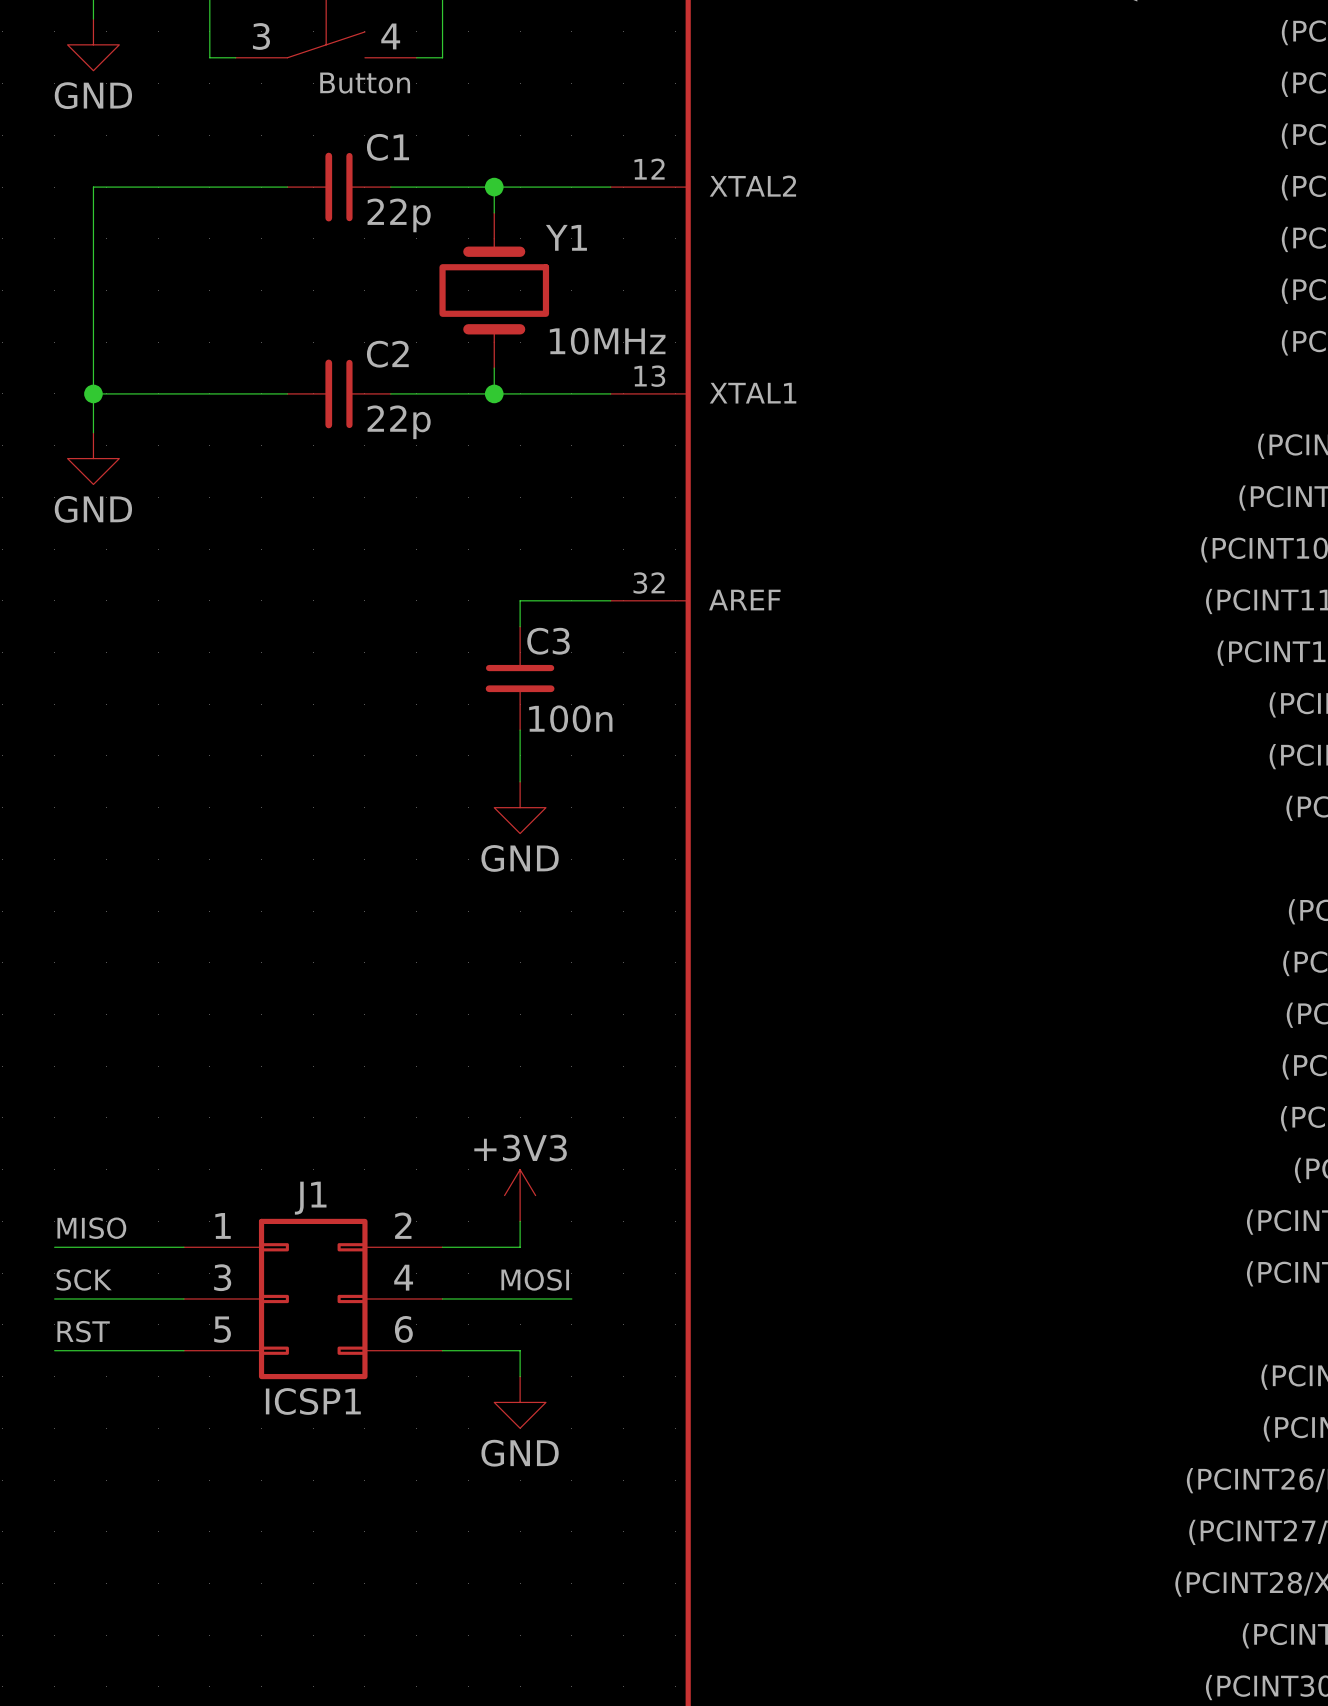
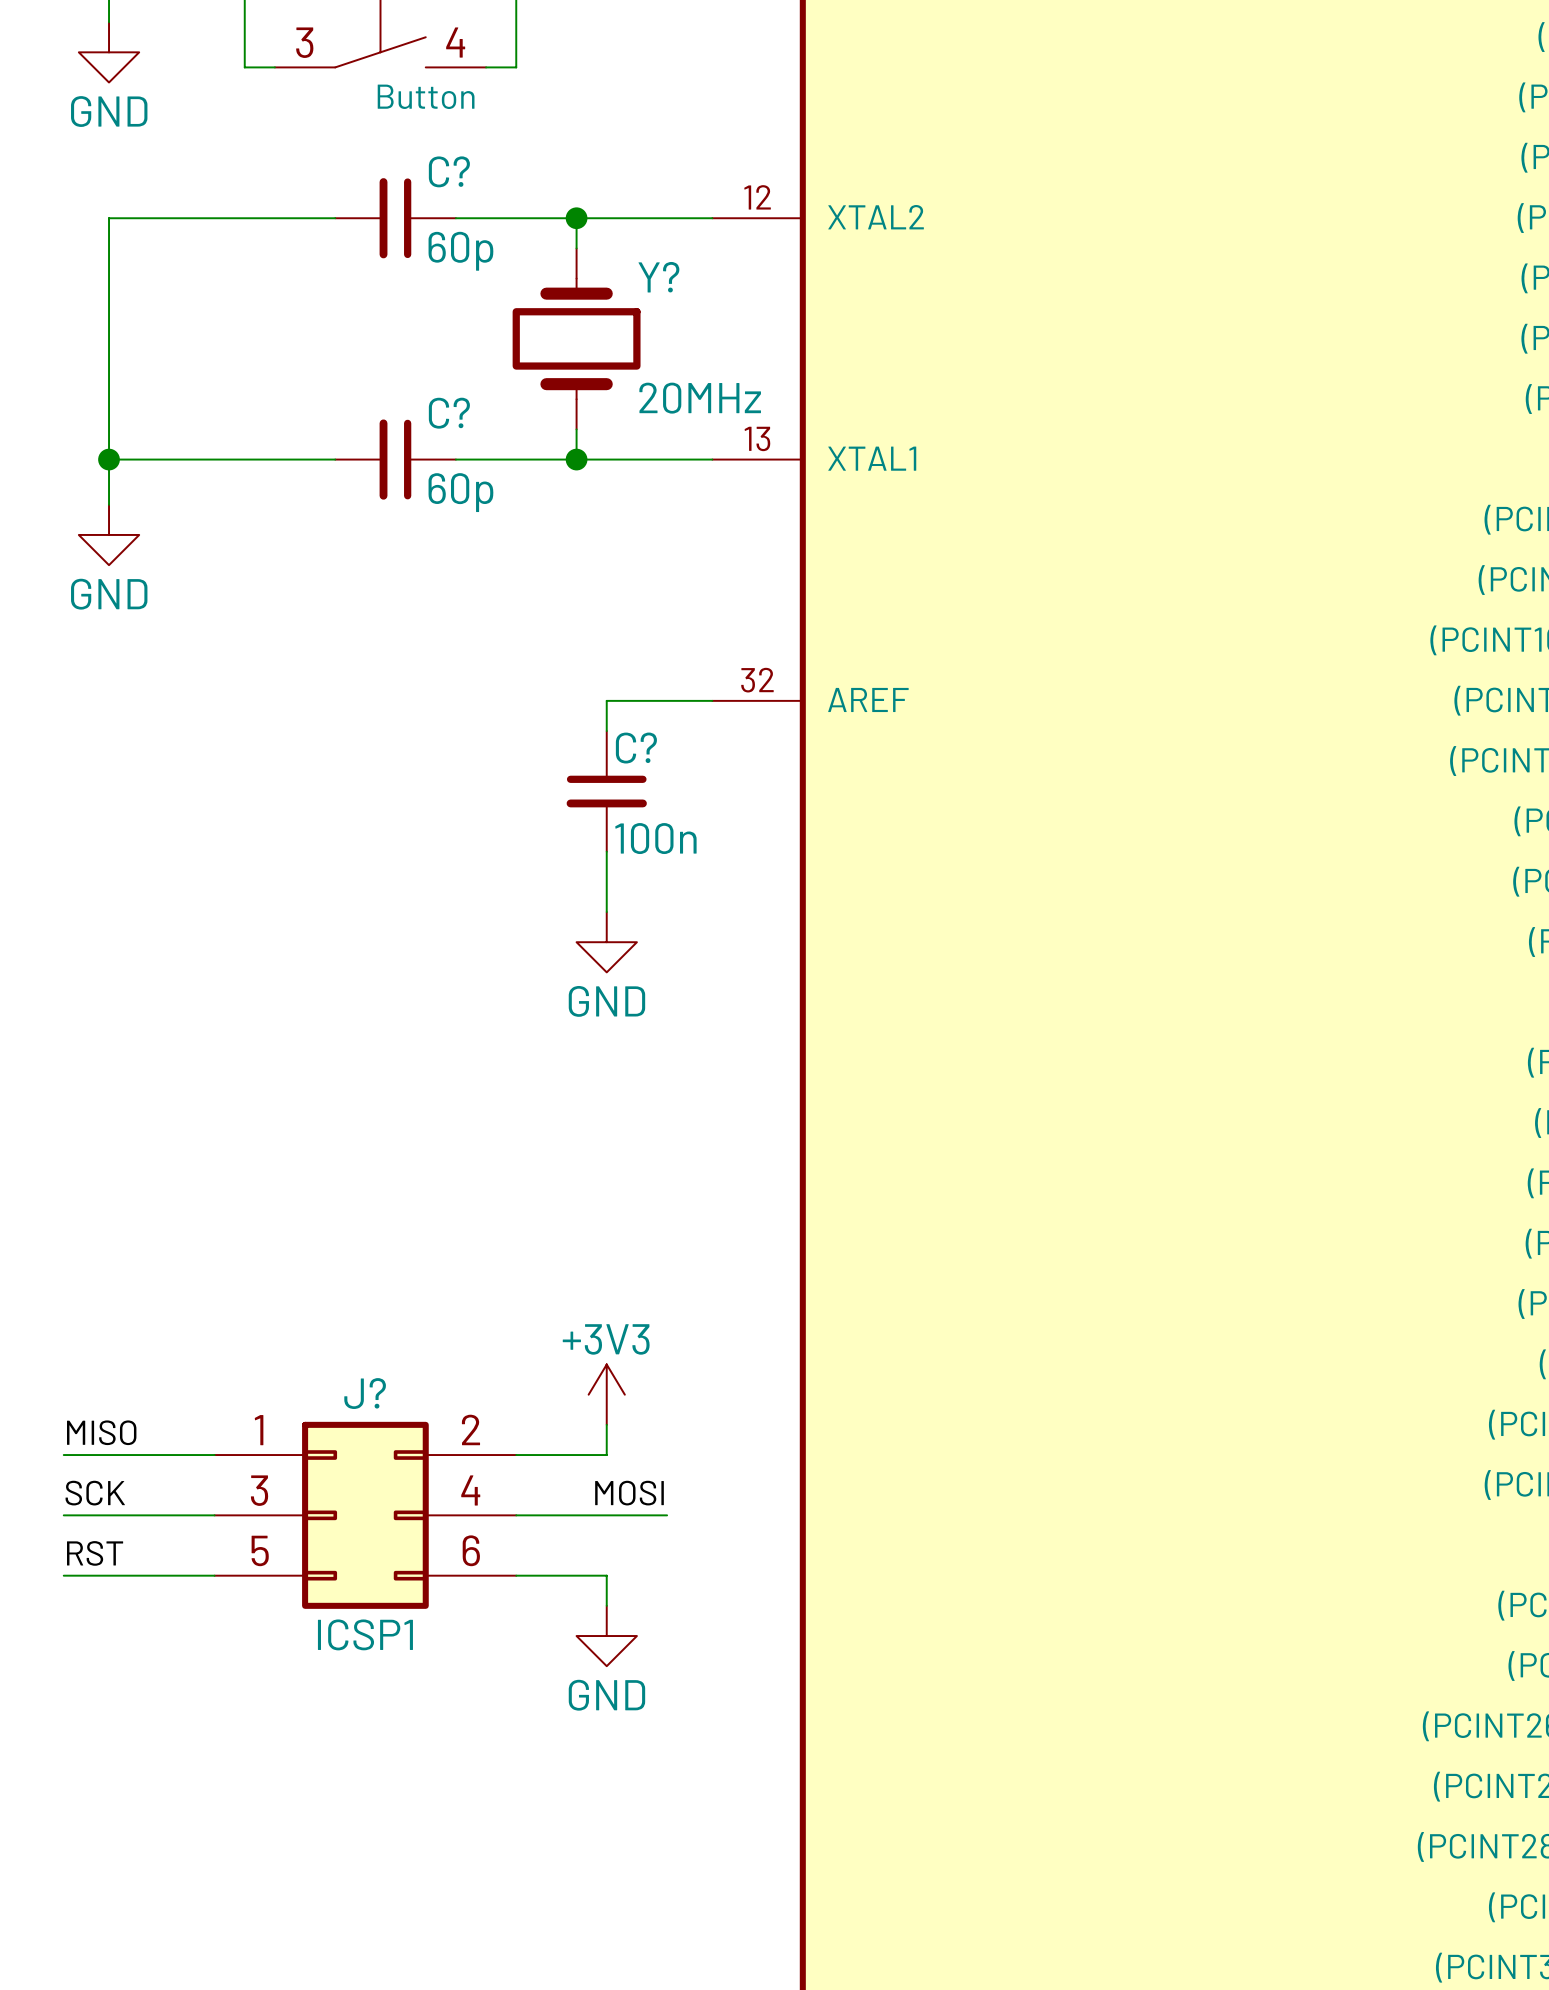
C1 name: C1 (387, 147) -> C? (449, 171)
C1 value: 22p (399, 215) -> 60p (460, 251)
Y1 name: Y1 (566, 237) -> Y? (658, 277)
Y1 value: 10MHz (607, 341) -> 20MHz (700, 398)
C2 name: C2 (387, 354) -> C? (449, 413)
C2 value: 22p (399, 422) -> 60p (460, 492)
C3 name: C3 (548, 641) -> C? (636, 748)
J1 name: J1 (310, 1198) -> J? (365, 1393)

